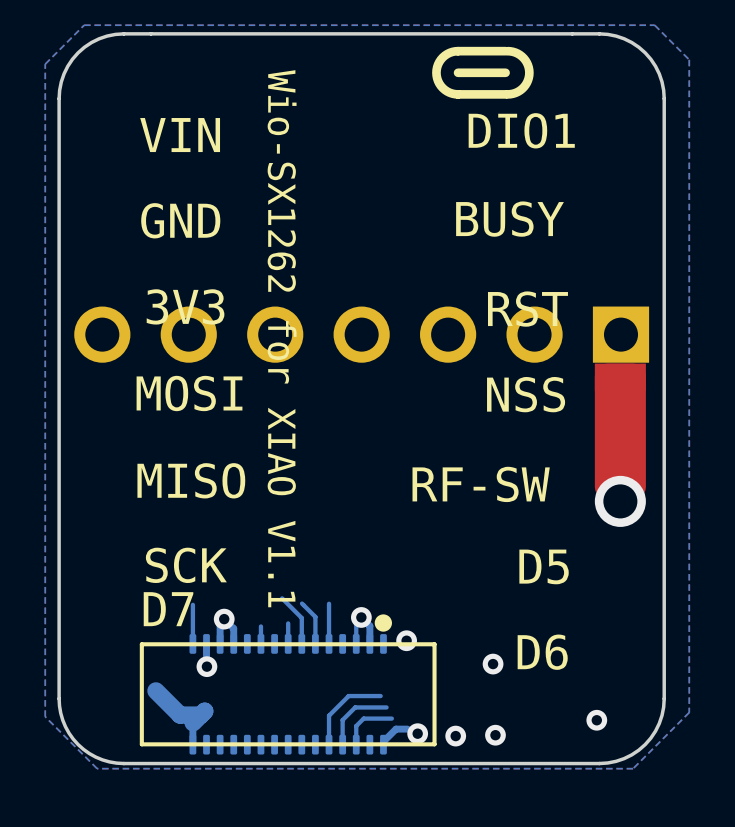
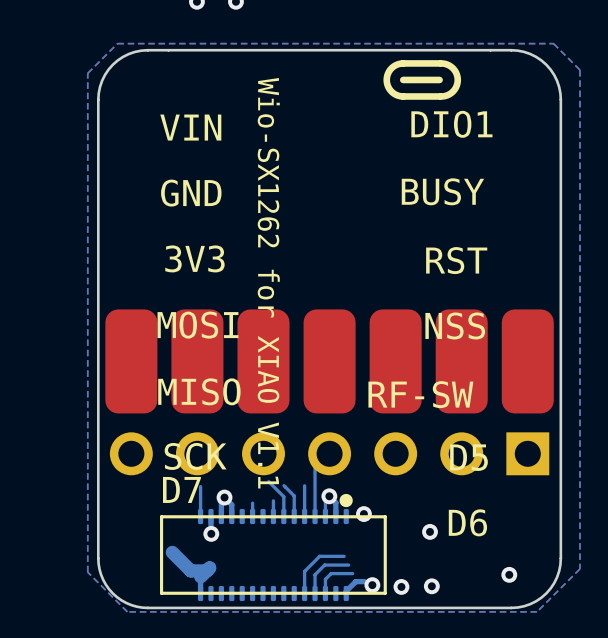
part position: (361, 334) -> (329, 453)
part footprint: [594, 363, 646, 500] -> [501, 309, 554, 414]
part: none -> (131, 361)
part: none -> (197, 361)
part: none -> (263, 361)
part: none -> (329, 361)
part: none -> (395, 361)
part: none -> (461, 361)
via: (620, 501) -> none
bottom track: none -> (315, 465) (315, 516)

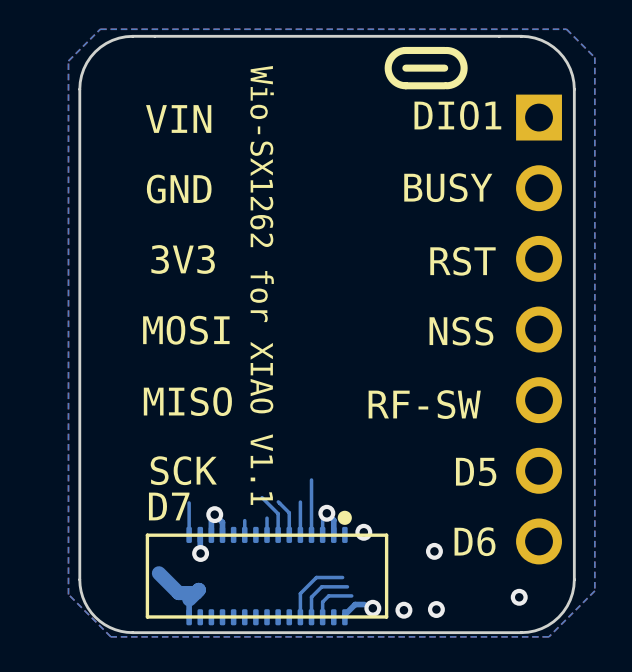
part: (131, 361) -> none
part: (197, 361) -> none
part: (263, 361) -> none
part: (329, 361) -> none
part: (395, 361) -> none
part: (461, 361) -> none
part: (527, 361) -> none
part rotation: 0° (329, 453) -> 90° counterclockwise (539, 329)

